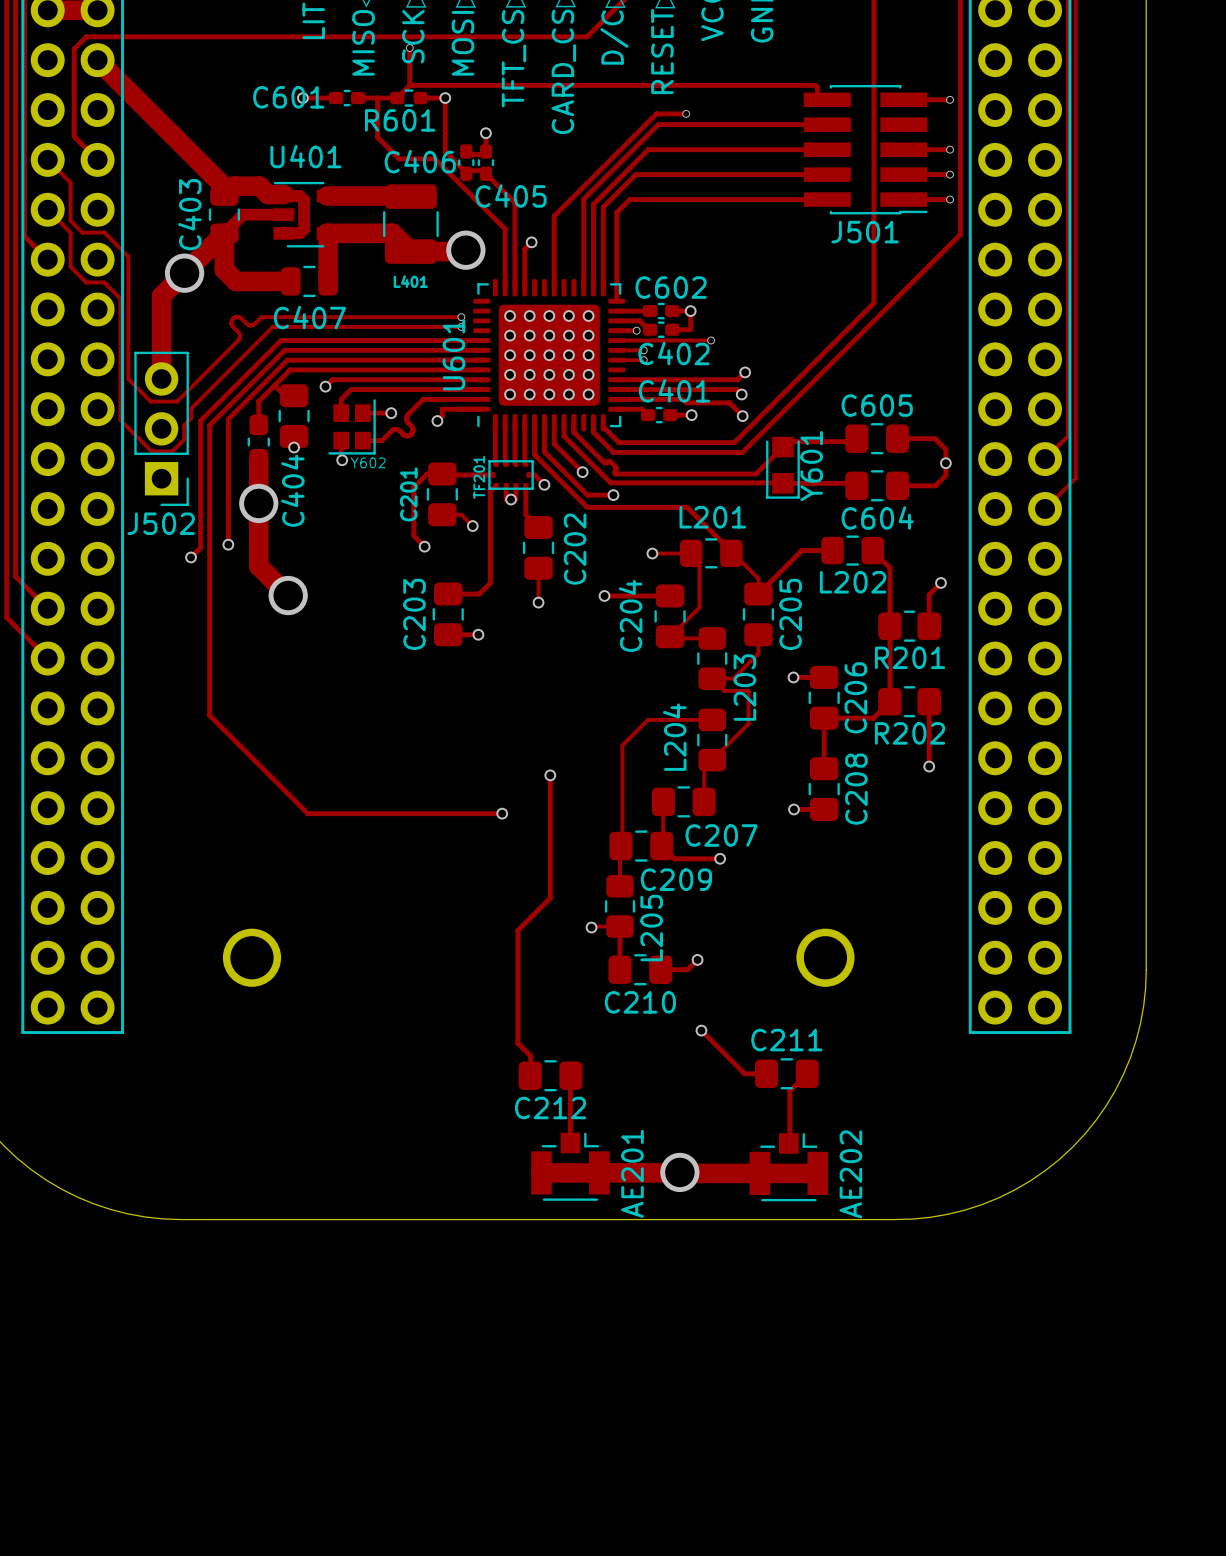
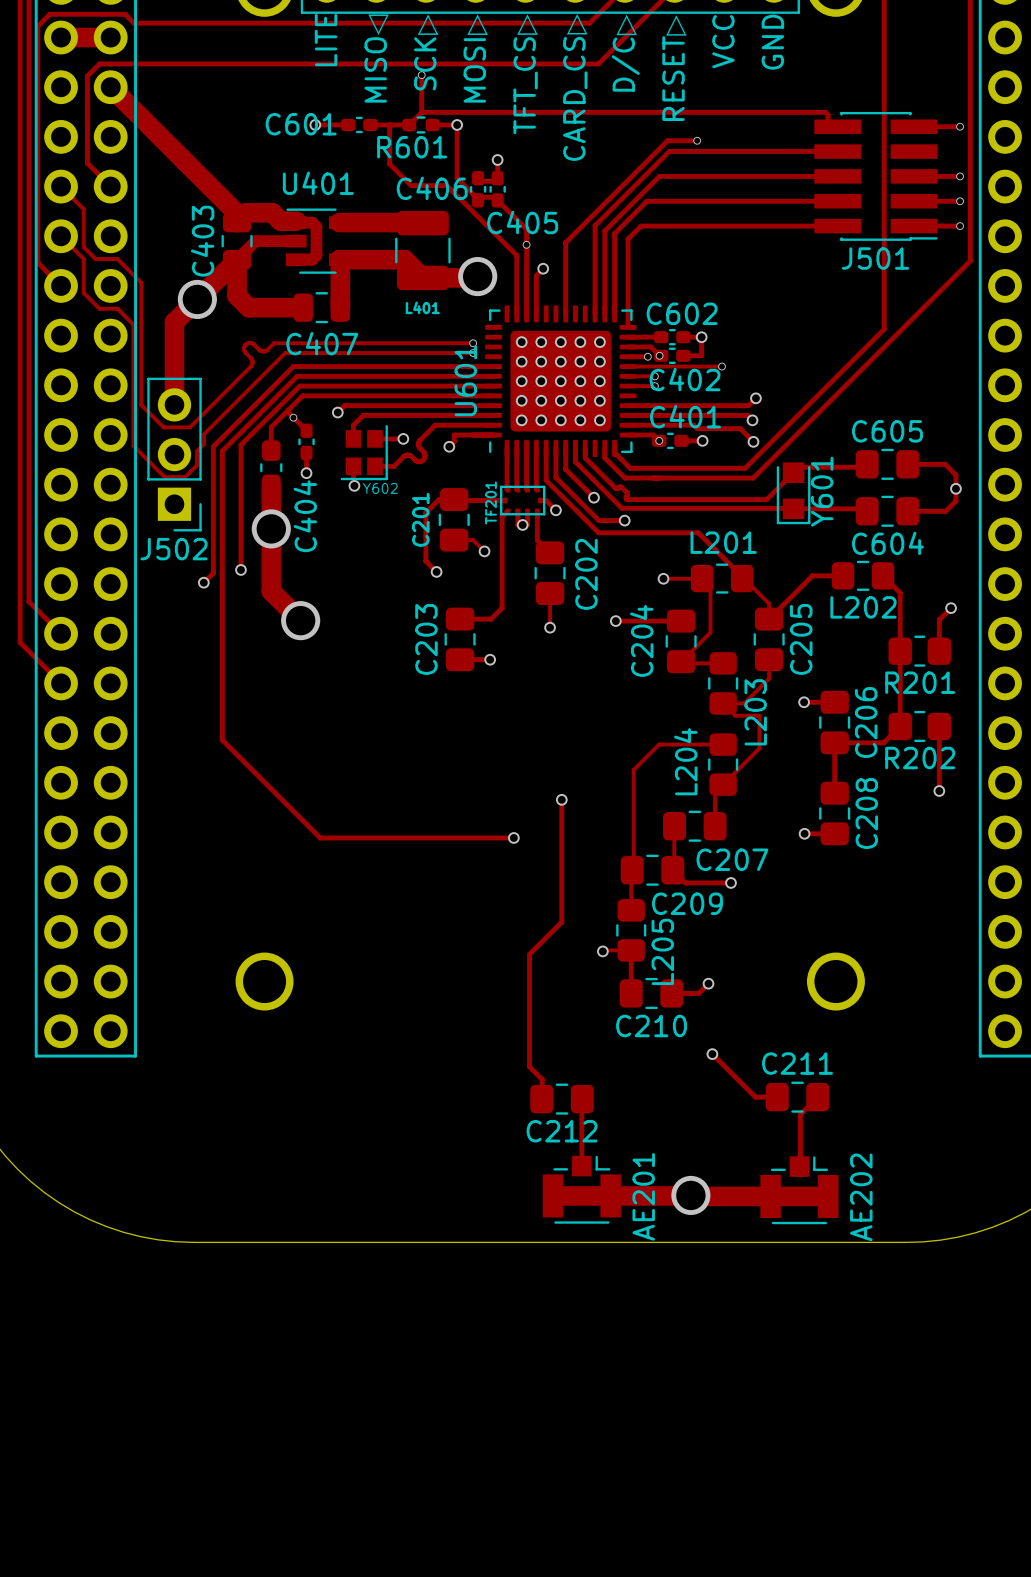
via: none -> (526, 244)
via: none -> (659, 355)
C404 footprint: [278, 384, 310, 449] -> [298, 423, 315, 461]
via: none -> (293, 417)
via: none -> (659, 440)

